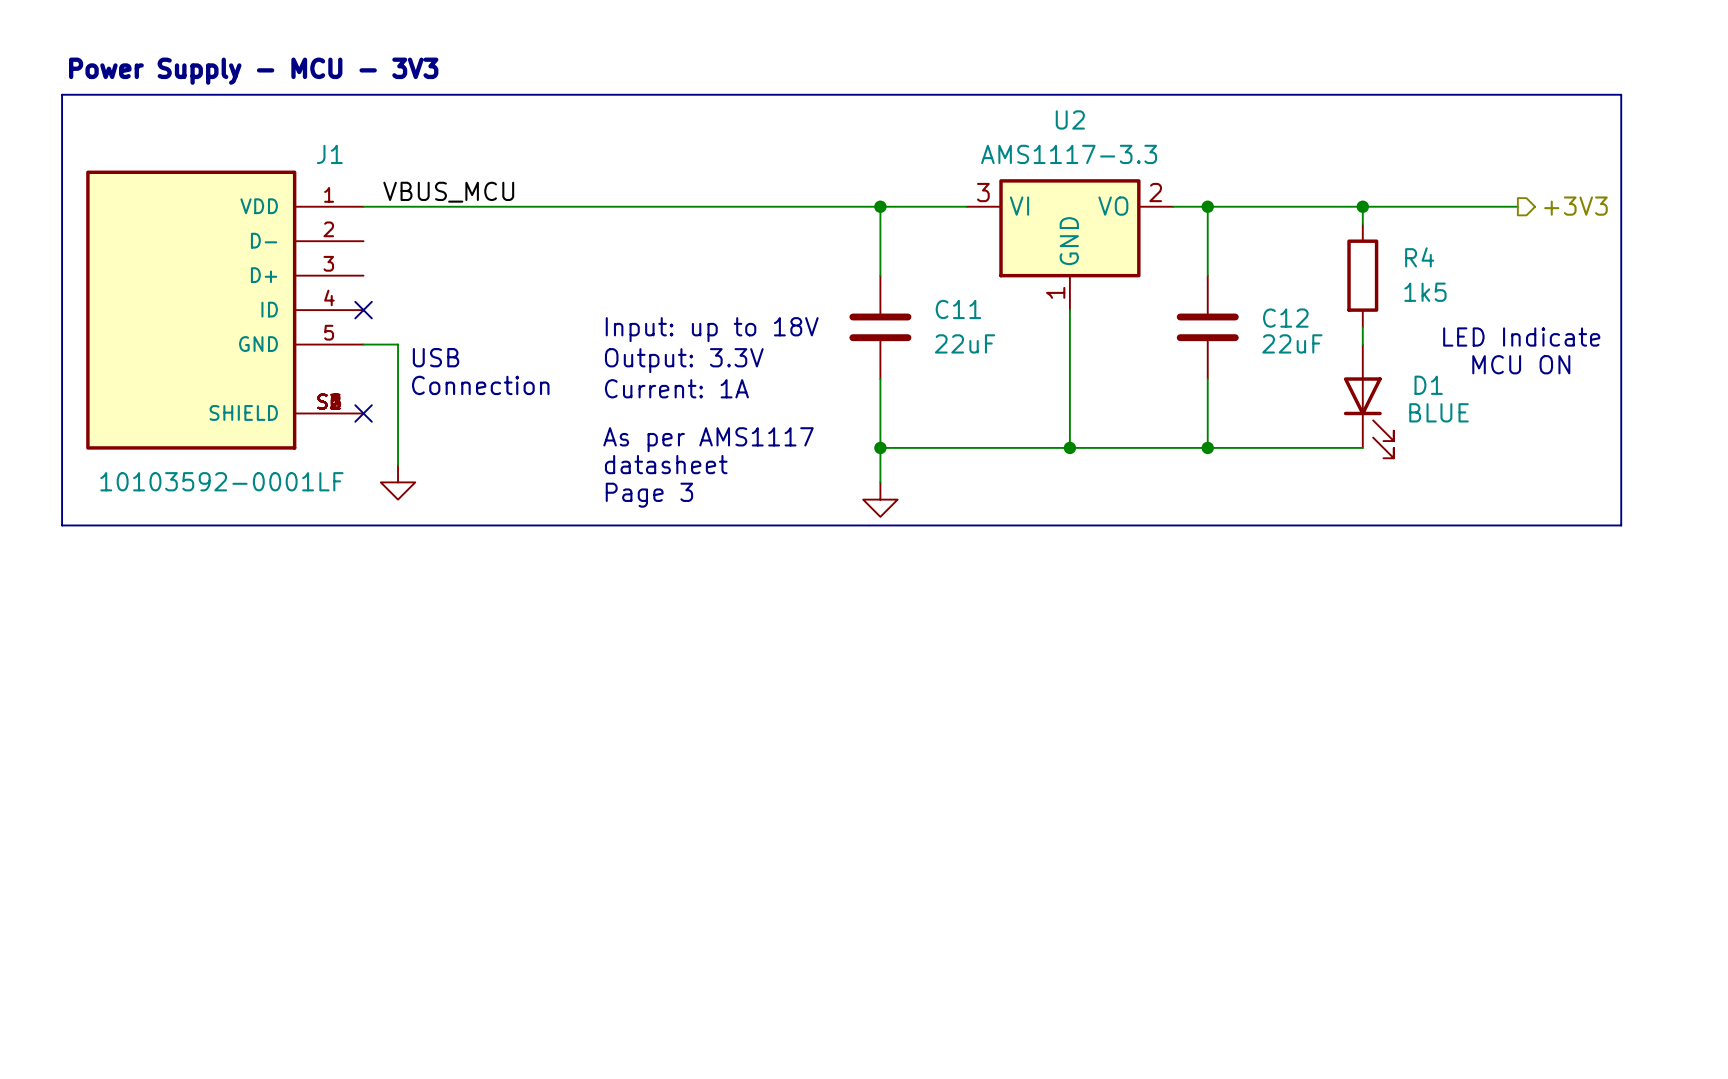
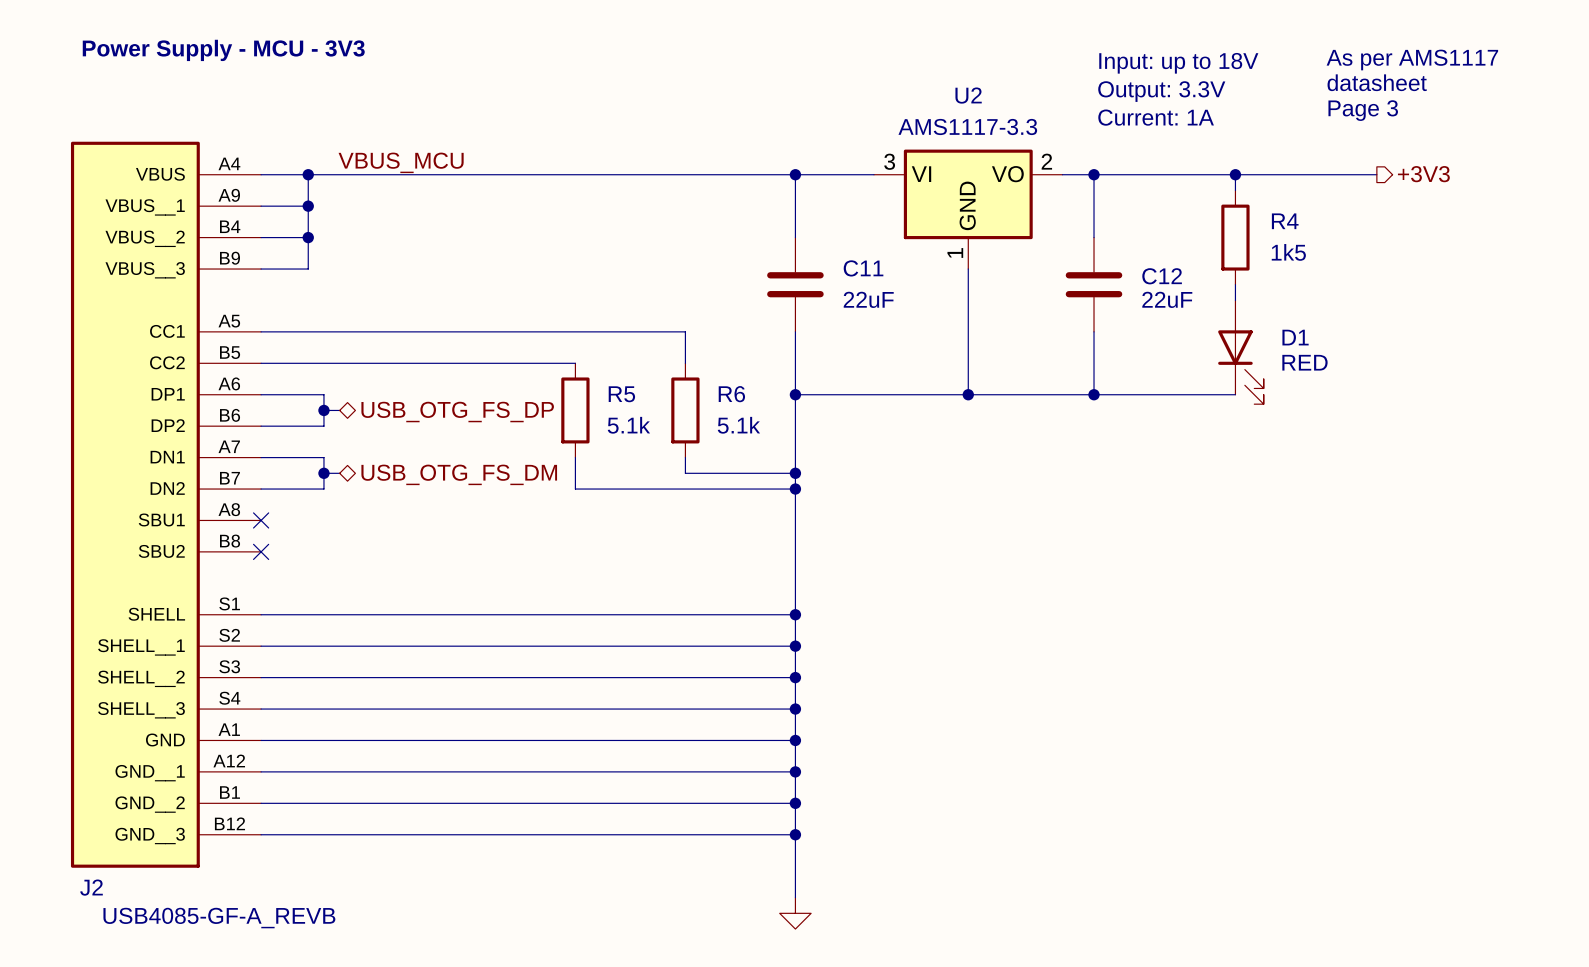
text: none -> As per AMS1117 (1412, 59)
text: none -> Input: up to 18V (1178, 63)
line: (62, 94) (1621, 94) (1621, 525) (62, 525) (62, 94) -> none
text: none -> datasheet (1377, 82)
text: none -> Output: 3.3V (1161, 91)
text: none -> Page 3 (1363, 110)
text: none -> Current: 1A (1156, 117)
wire: none -> (308, 174) (308, 269) (261, 269)
junction: none -> (308, 174)
junction: none -> (308, 206)
junction: none -> (308, 237)
J1: 10103592-0001LF (224, 310) -> none
no-connect mark: (363, 310) -> none
text: Input: up to 18V (712, 329) -> none
text: LED Indicate (1521, 337) -> none
wire: (363, 344) (398, 344) (398, 465) -> none
text: USB (436, 357) -> none
text: Output: 3.3V (684, 360) -> none
text: MCU ON (1521, 364) -> none
wire: none -> (261, 331) (685, 331) (685, 363)
text: Connection (480, 385) -> none
text: Current: 1A (676, 388) -> none
D1 value: BLUE (1439, 412) -> RED (1304, 362)
wire: none -> (261, 363) (575, 363)
no-connect mark: (363, 413) -> none
text: As per AMS1117 (708, 439) -> none
wire: none -> (261, 394) (323, 394) (323, 426) (261, 426)
text: datasheet (666, 464) -> none
wire: none -> (323, 410) (339, 410)
junction: none -> (323, 410)
hierarchical label: none -> USB_OTG_FS_DP (457, 412)
R5: none -> 5.1k (575, 410)
R6: none -> 5.1k (685, 410)
power symbol: (398, 482) -> none
wire: none -> (795, 426) (795, 897)
text: Page 3 (649, 495) -> none
power symbol: (880, 499) -> none
wire: none -> (261, 457) (323, 457) (323, 489) (261, 489)
wire: none -> (575, 457) (575, 489) (795, 489)
wire: none -> (685, 457) (685, 473) (795, 473)
wire: none -> (323, 473) (339, 473)
junction: none -> (323, 473)
hierarchical label: none -> USB_OTG_FS_DM (459, 474)
junction: none -> (795, 473)
junction: none -> (795, 489)
J2: none -> USB4085-GF-A_REVB (166, 504)
no-connect mark: none -> (261, 520)
no-connect mark: none -> (261, 551)
wire: none -> (261, 614) (795, 614)
junction: none -> (795, 614)
wire: none -> (261, 646) (795, 646)
junction: none -> (795, 646)
wire: none -> (261, 677) (795, 677)
junction: none -> (795, 677)
wire: none -> (261, 709) (795, 709)
junction: none -> (795, 709)
wire: none -> (261, 740) (795, 740)
junction: none -> (795, 740)
wire: none -> (261, 771) (795, 771)
junction: none -> (795, 771)
wire: none -> (261, 803) (795, 803)
junction: none -> (795, 803)
wire: none -> (261, 834) (795, 834)
junction: none -> (795, 834)
power symbol: none -> (795, 913)

